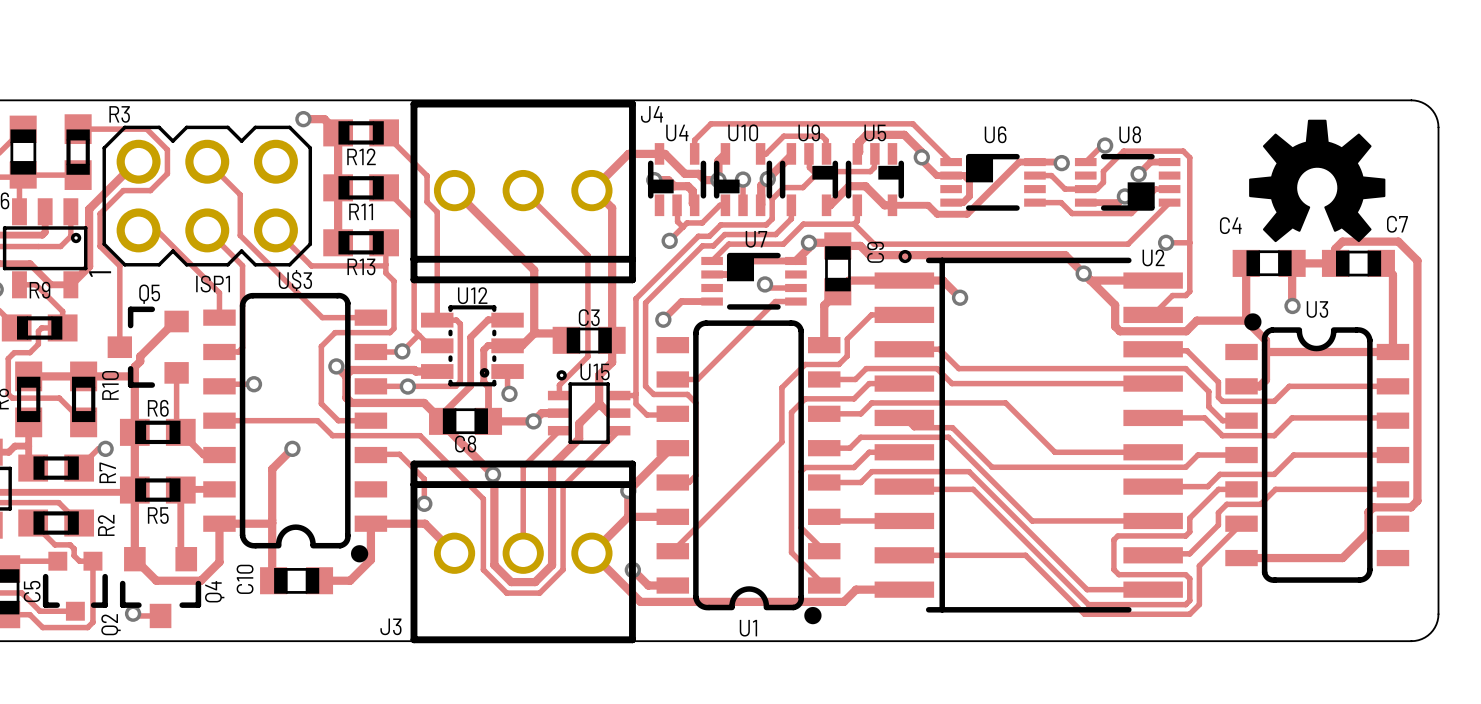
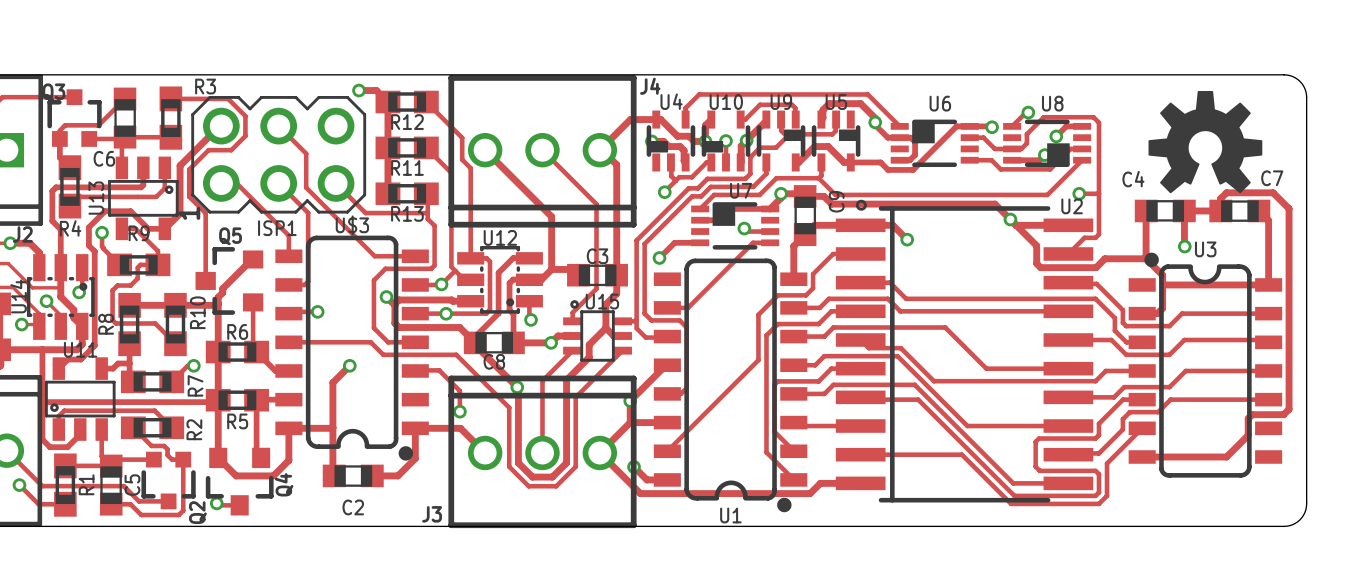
C10 name: C10 (245, 579) -> C2 (353, 507)

